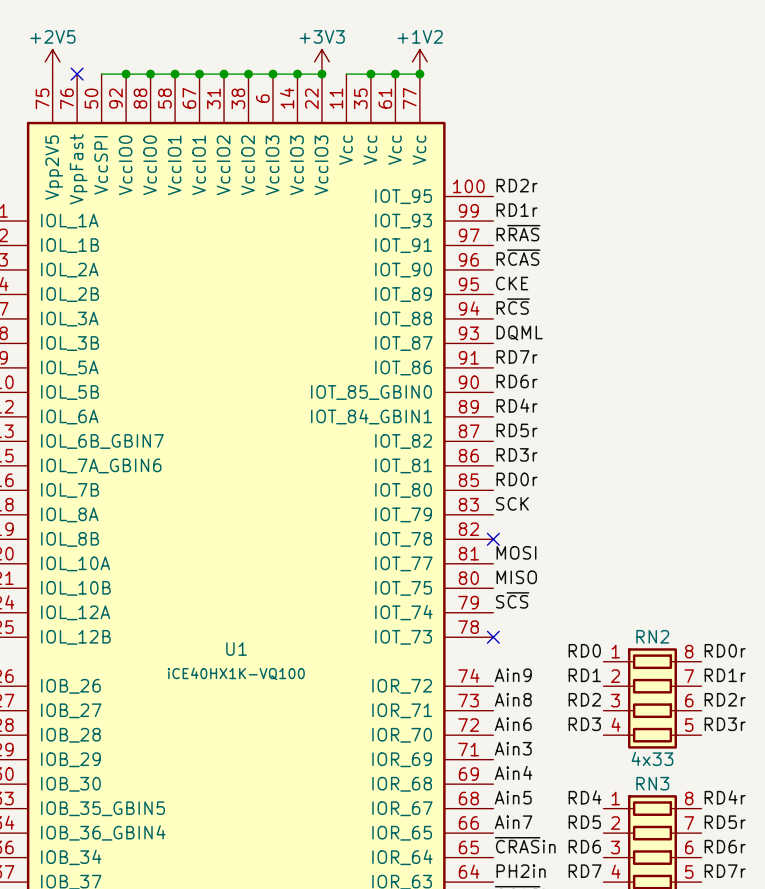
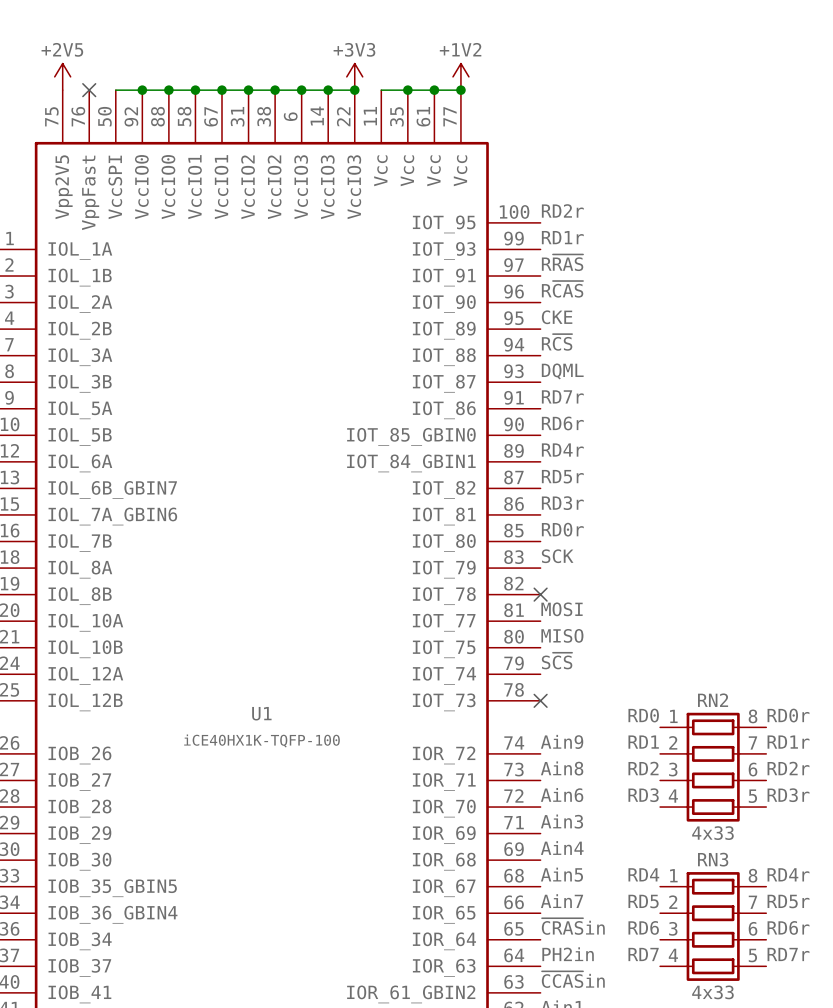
U1 value: iCE40HX1K-VQ100 (236, 673) -> iCE40HX1K-TQFP-100 (261, 740)

